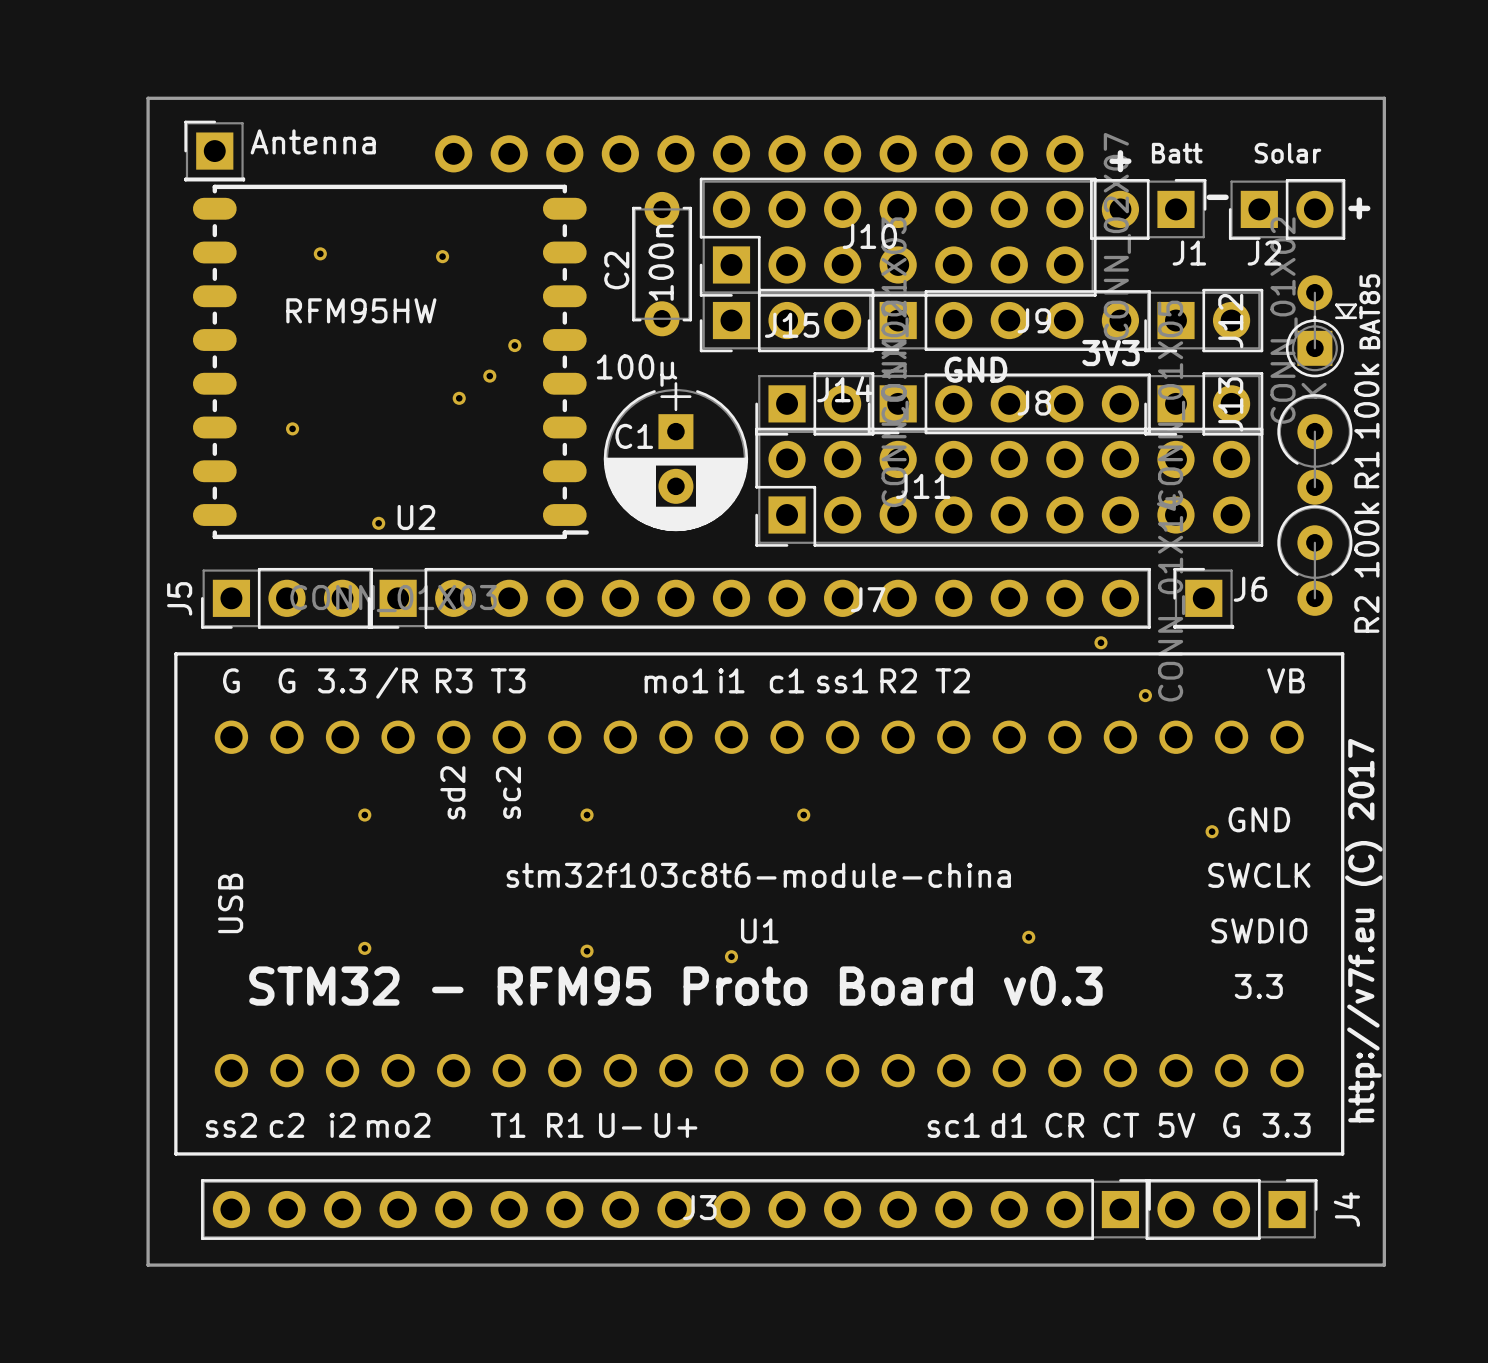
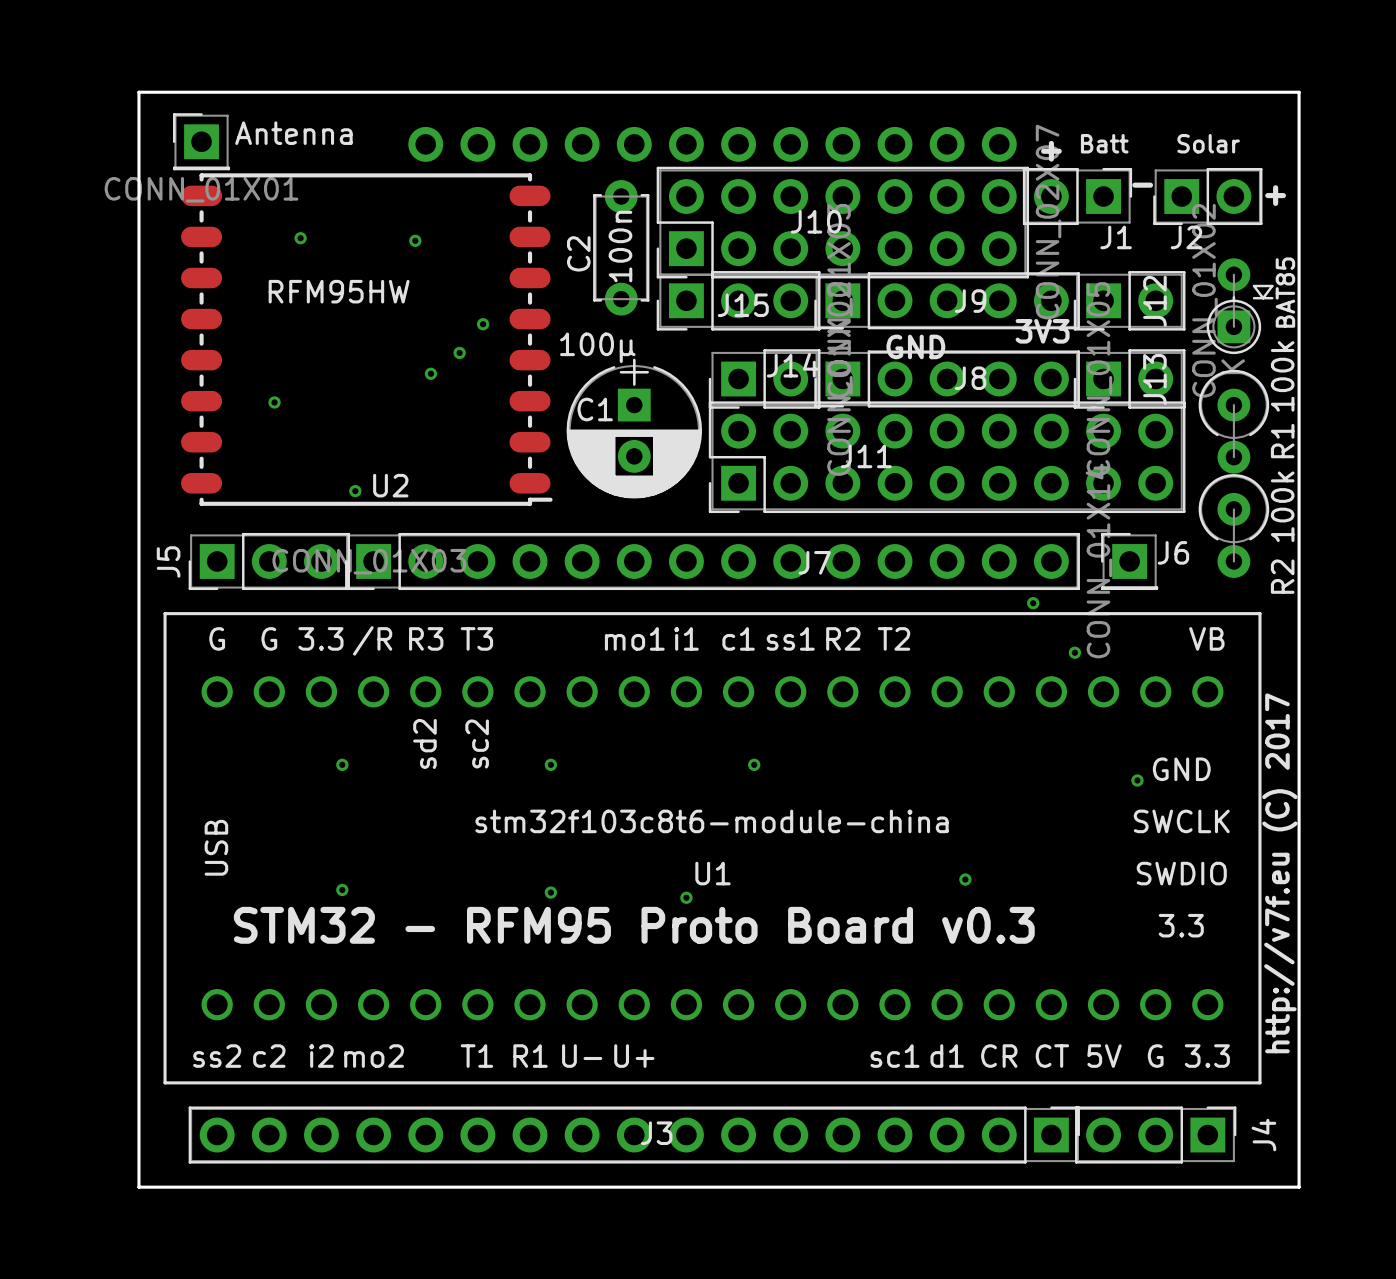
part value: none -> CONN_01X01 (201, 189)

